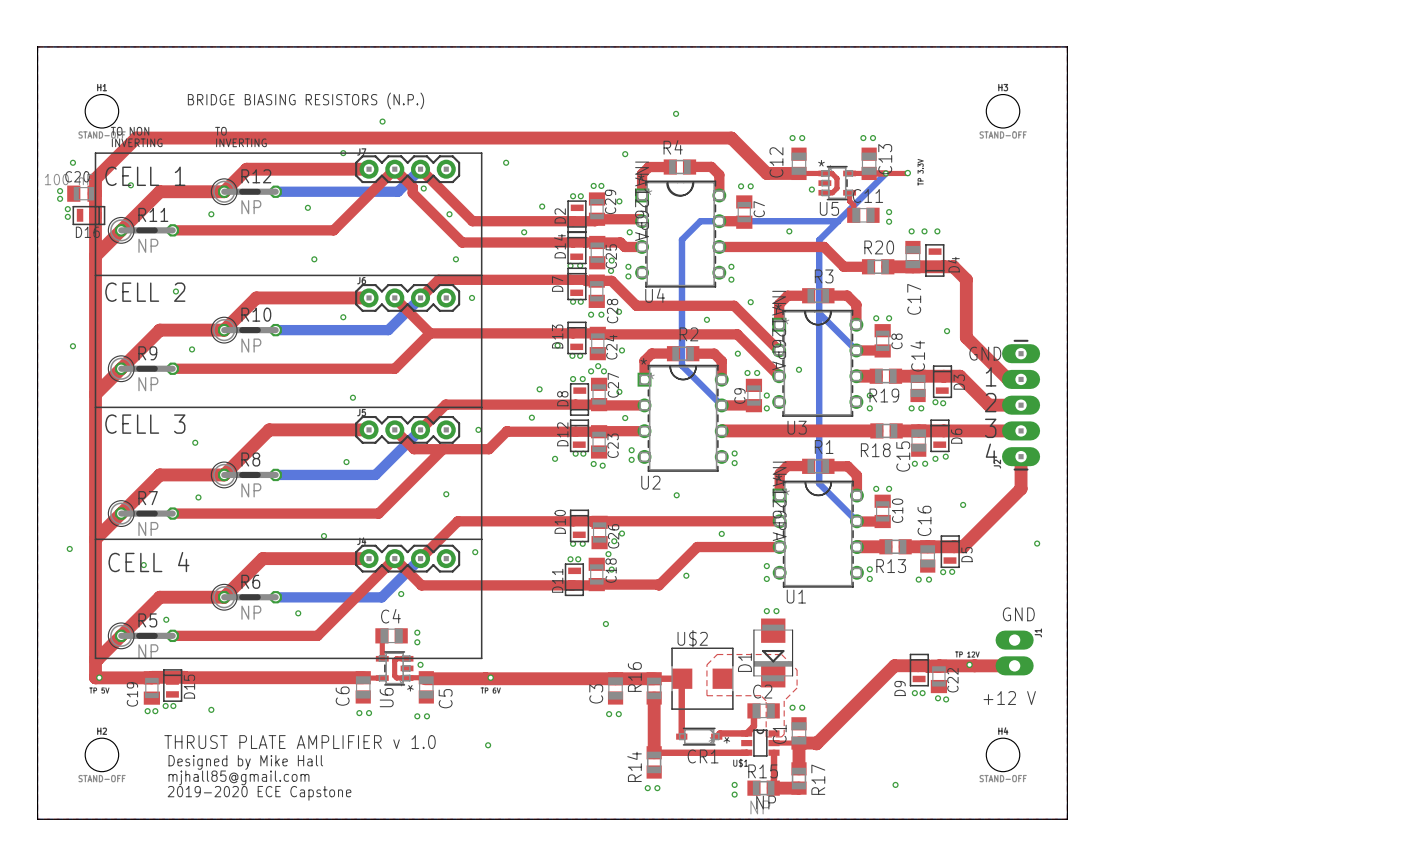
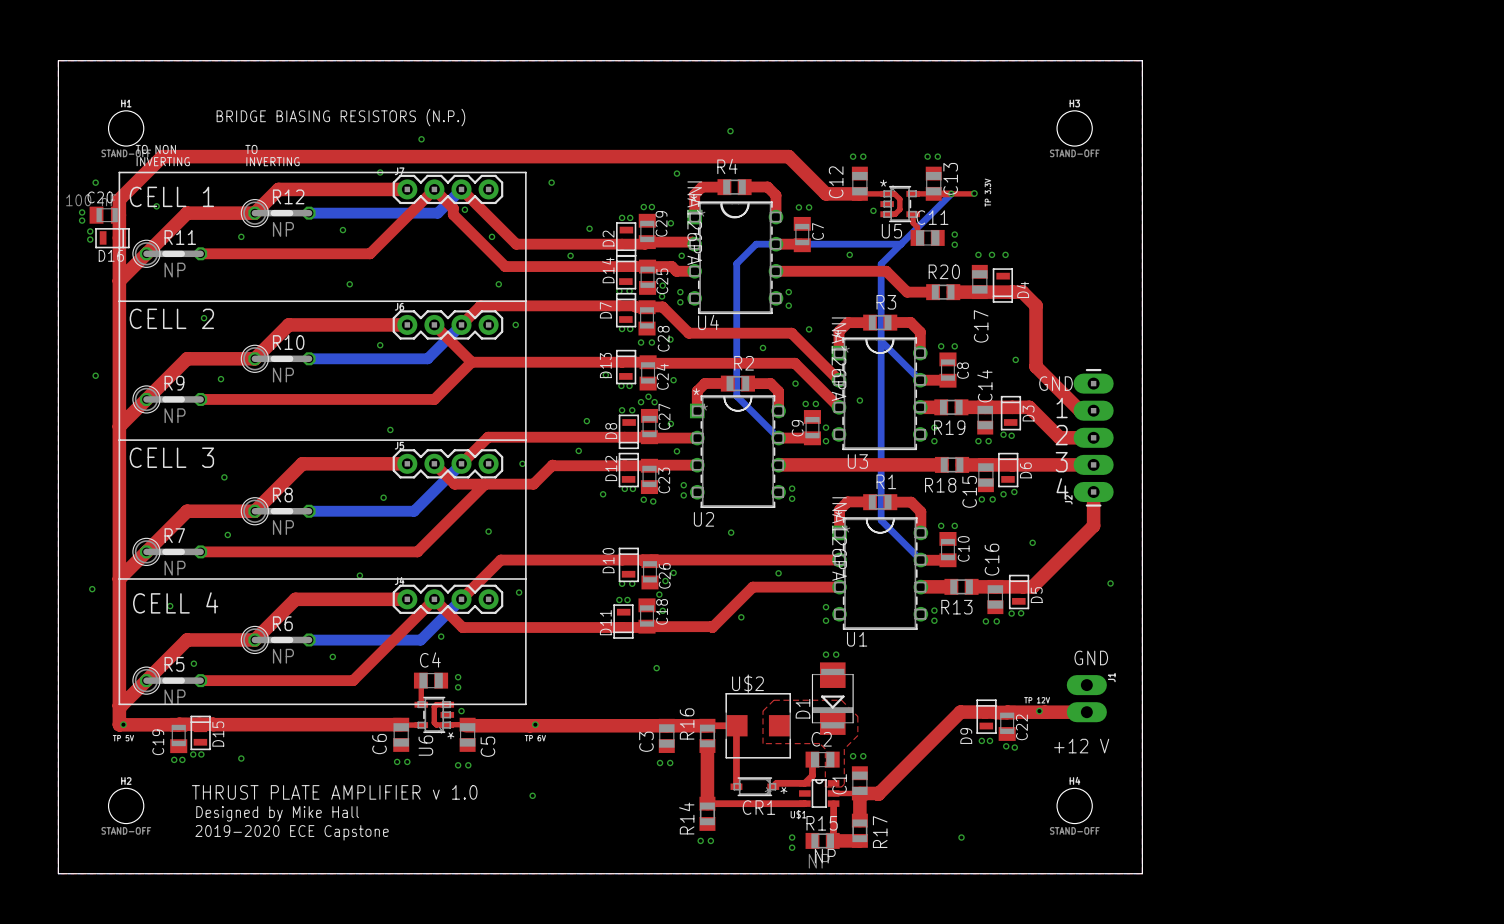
text: mjhall85@gmail.com (238, 777) -> 2019-2020 ECE Capstone (292, 832)
text: 2019-2020 ECE Capstone (259, 793) -> none

